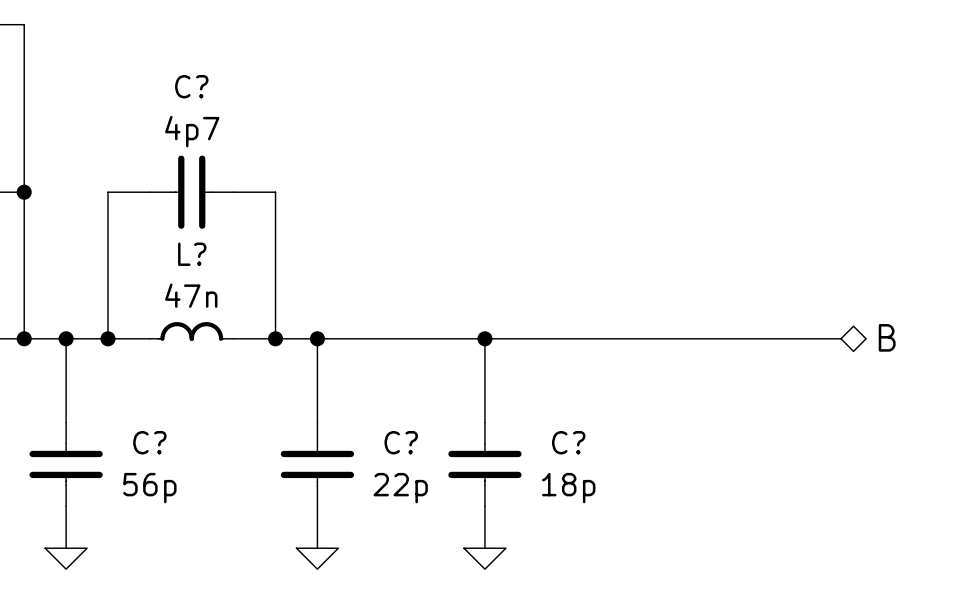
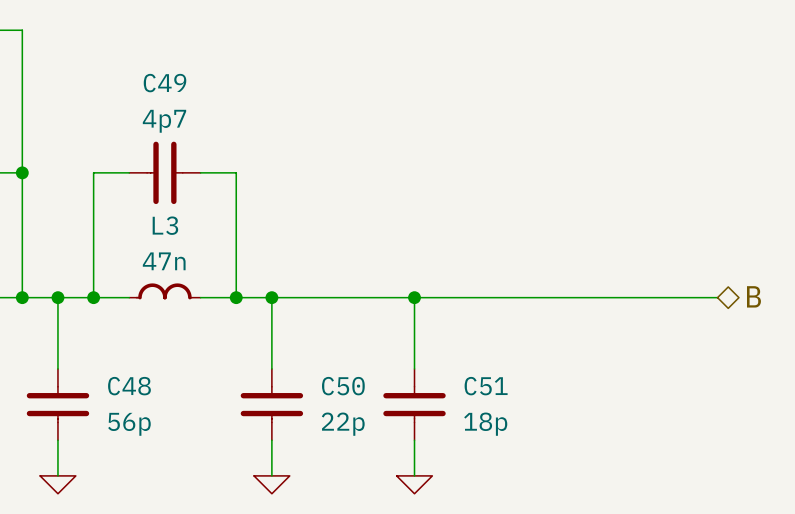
C? name: C? (191, 86) -> C49 (165, 83)
L? name: L? (192, 254) -> L3 (165, 225)
C? name: C? (149, 442) -> C48 (129, 386)
C? name: C? (401, 442) -> C50 (343, 386)
C? name: C? (568, 442) -> C51 (486, 386)

